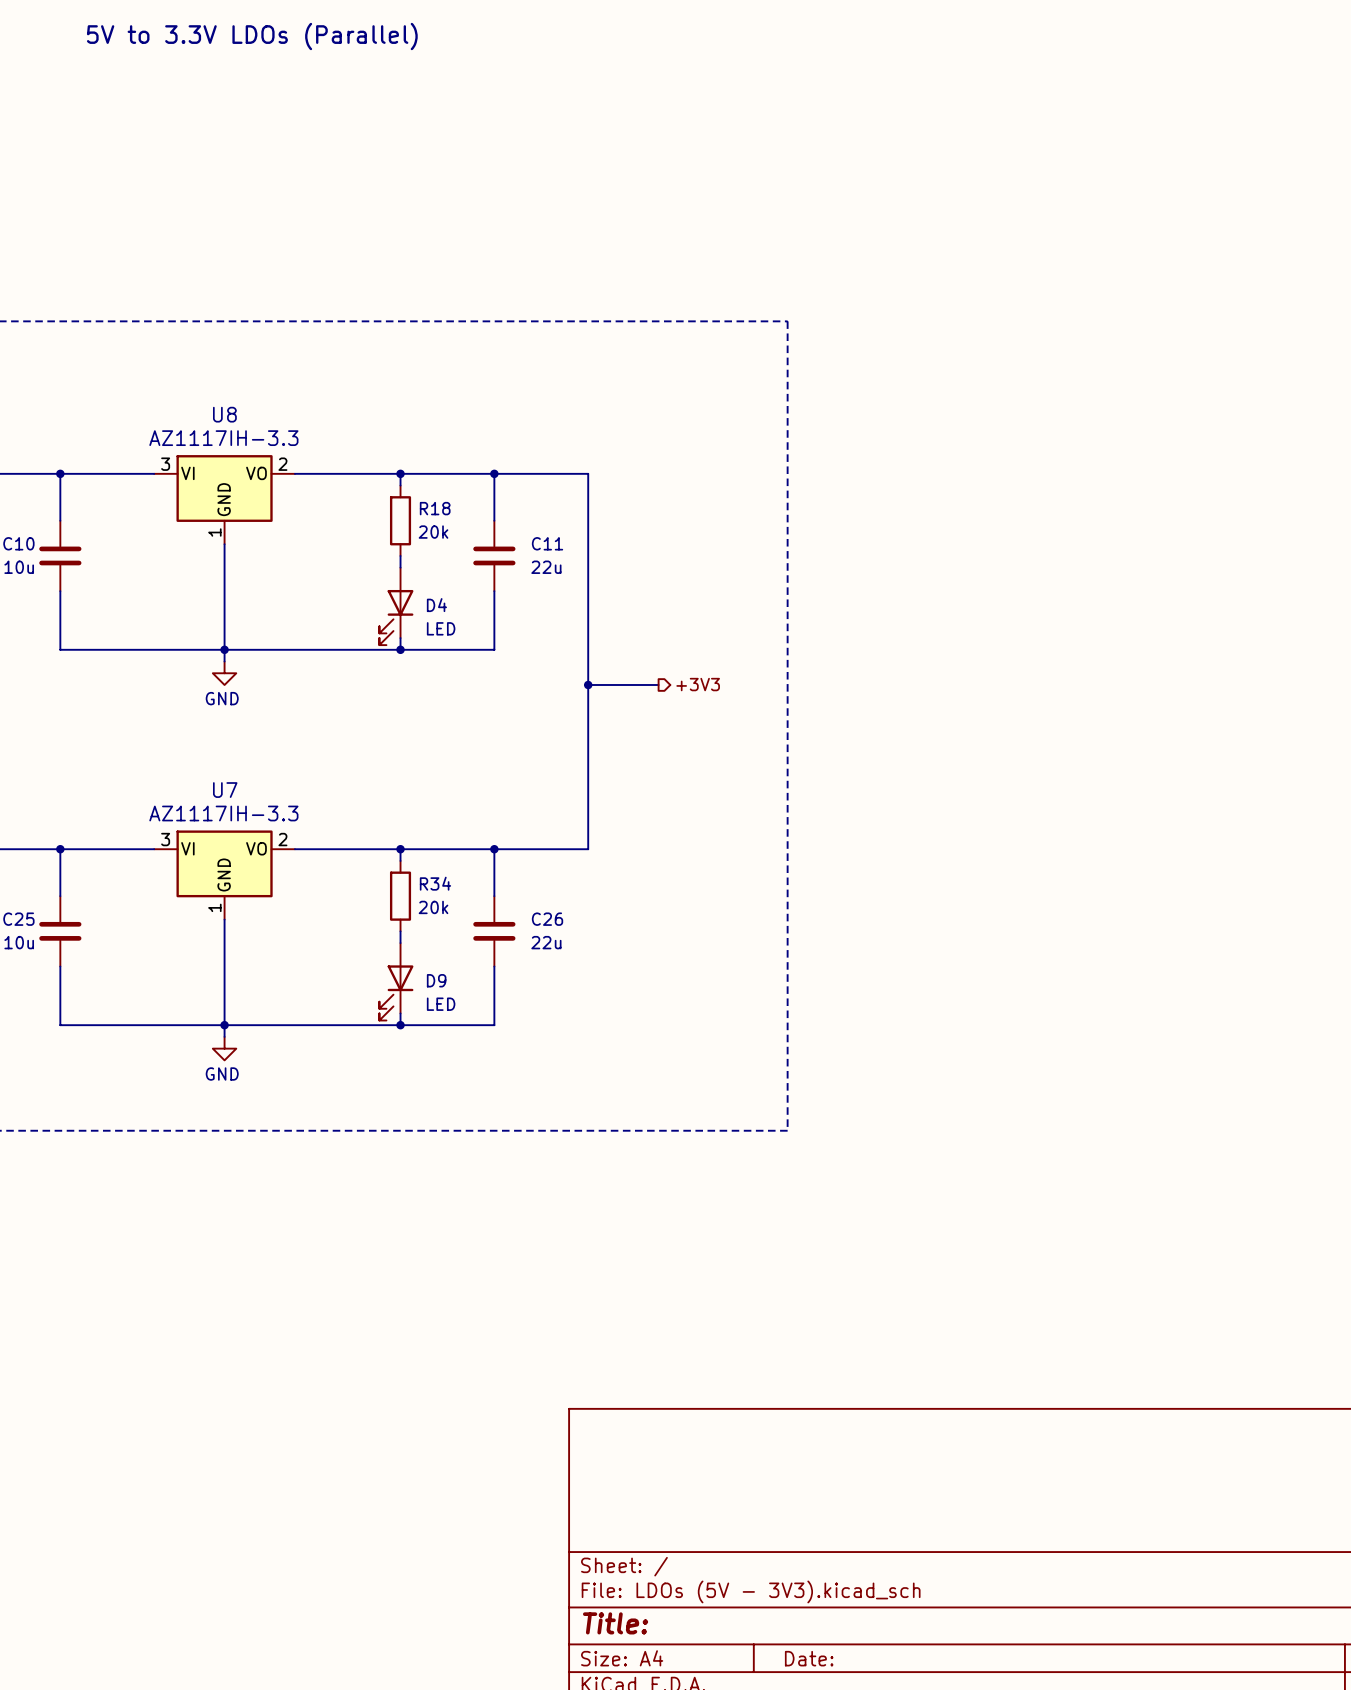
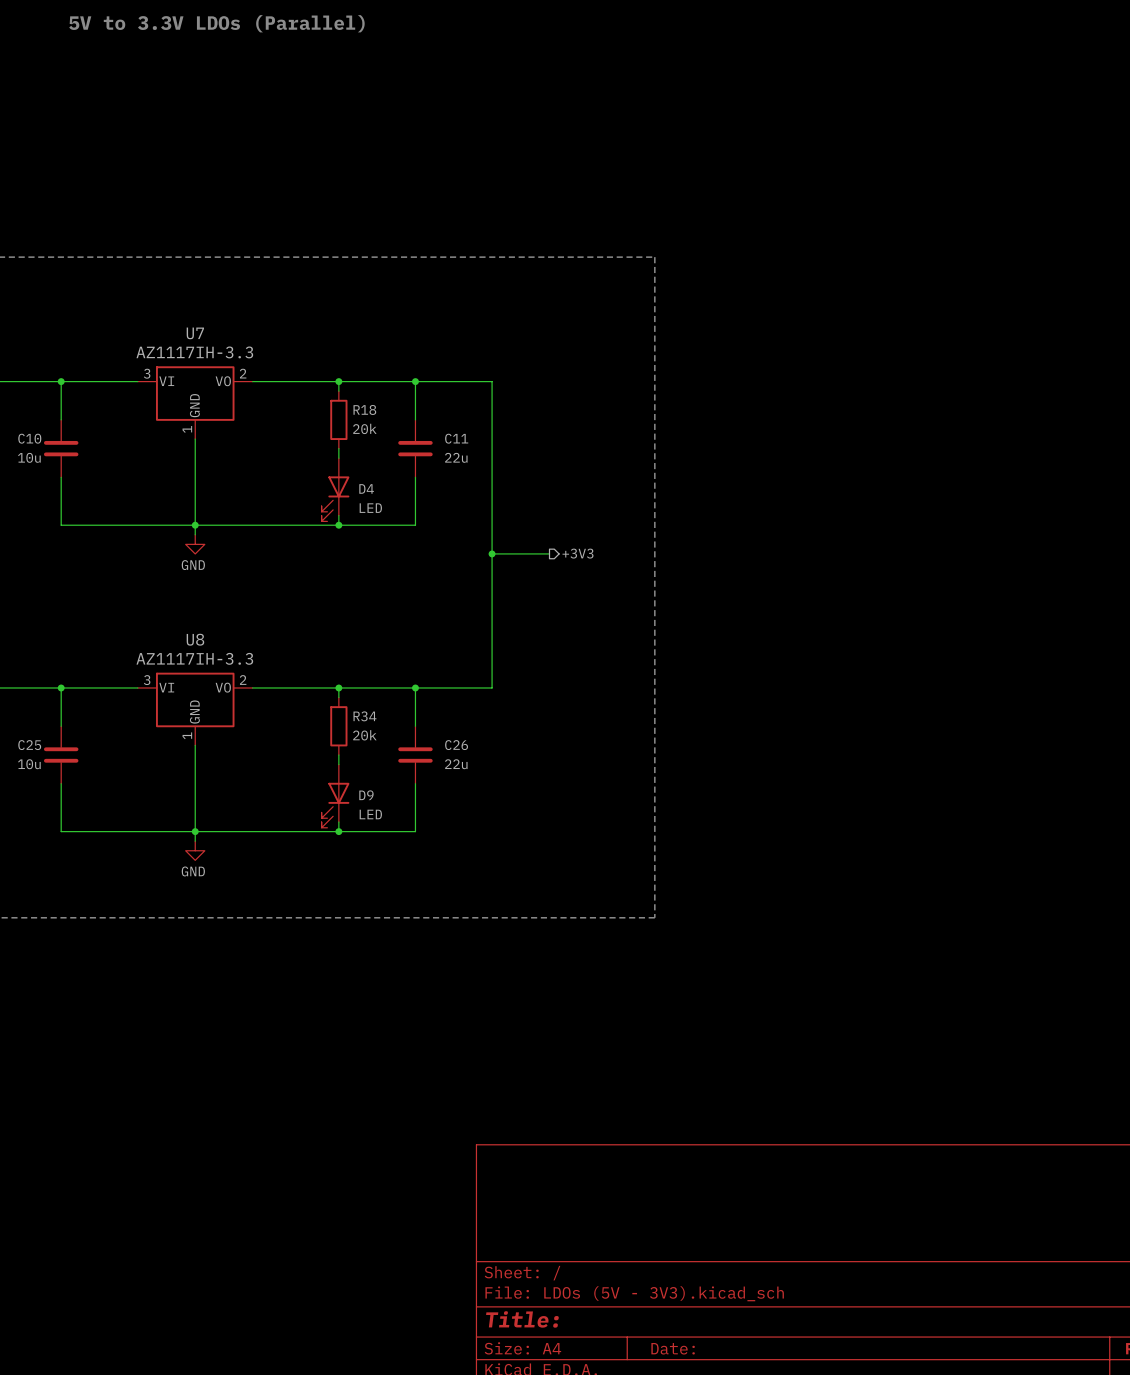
U8 name: U8 (224, 414) -> U7 (195, 333)
U7 name: U7 (225, 790) -> U8 (195, 639)

